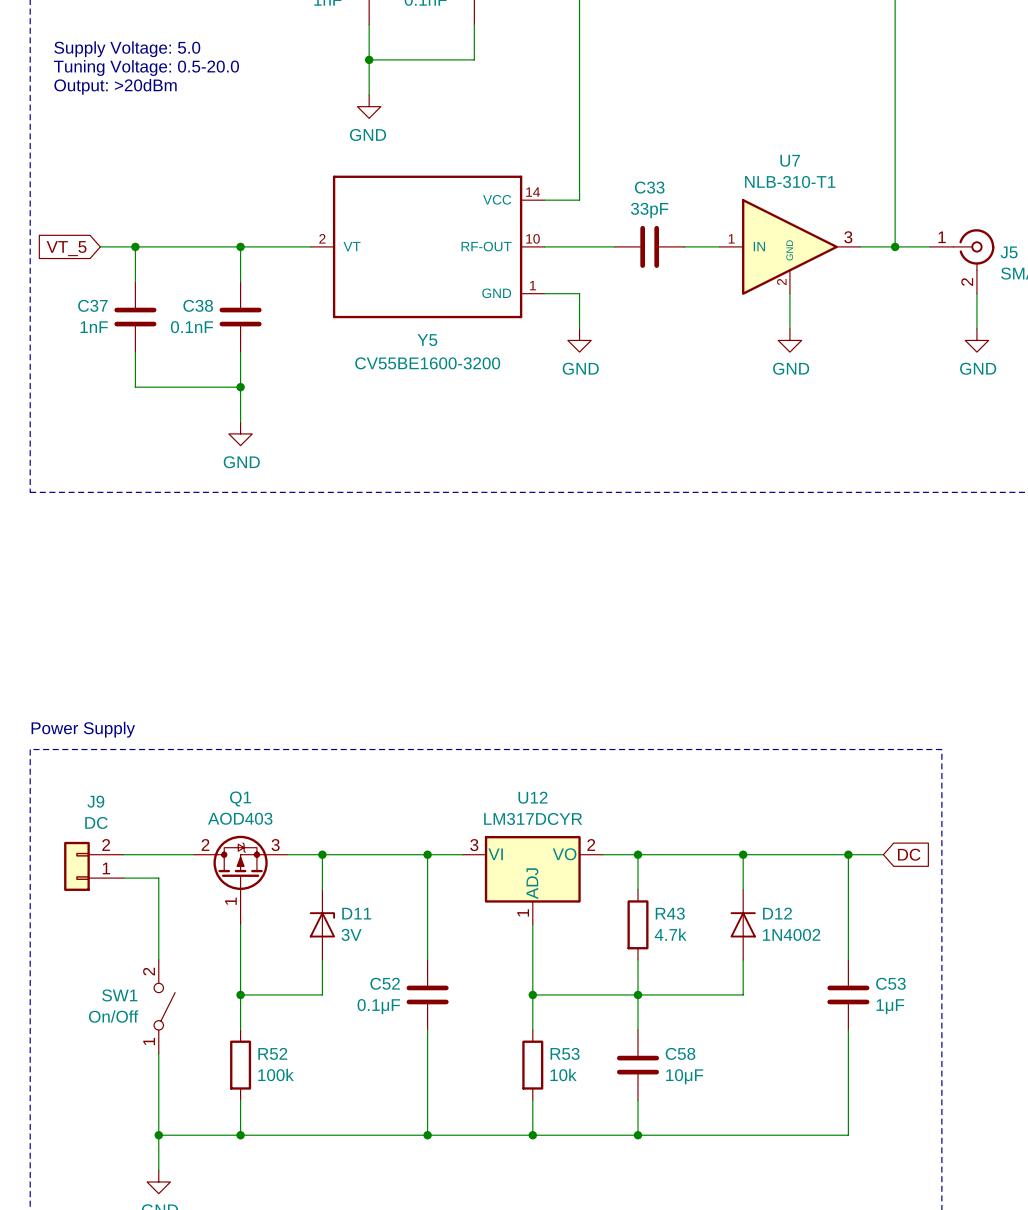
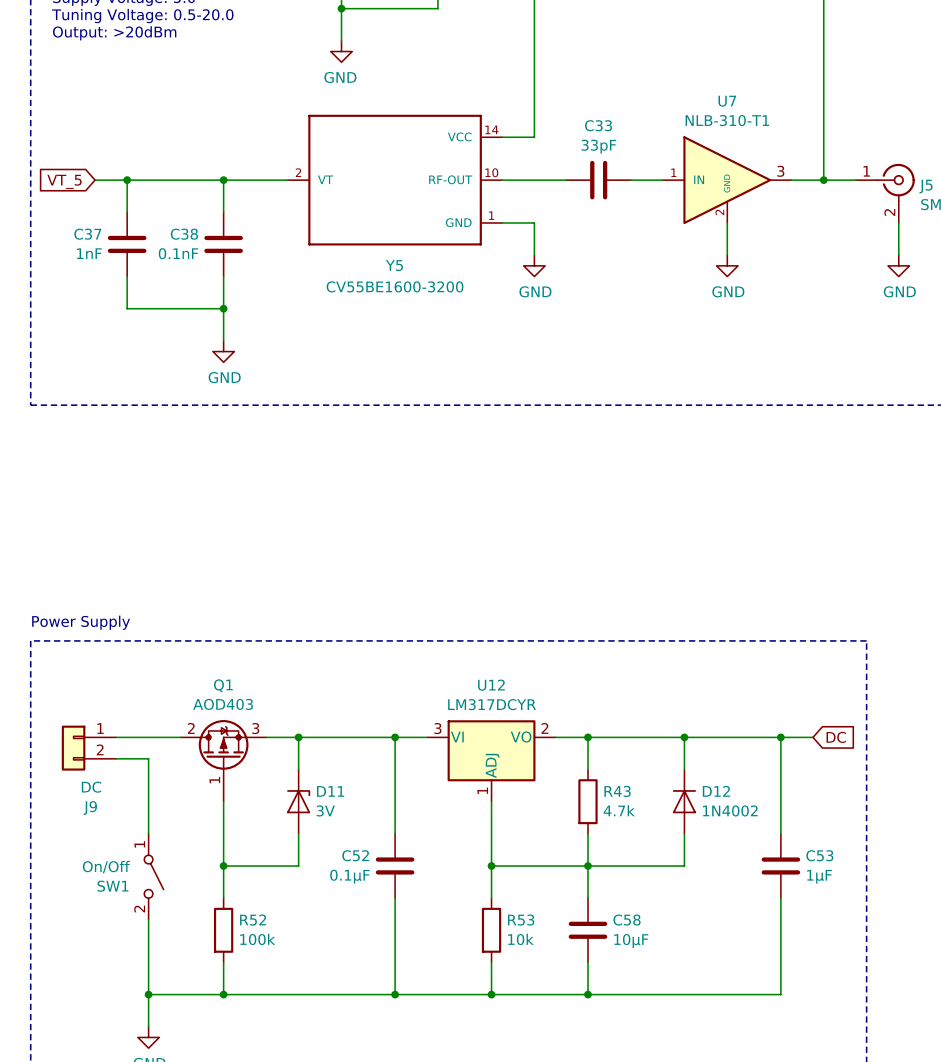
J9 flip: as is (76, 866) -> up-down (73, 748)
SW1 flip: as is (164, 1006) -> up-down (153, 876)

